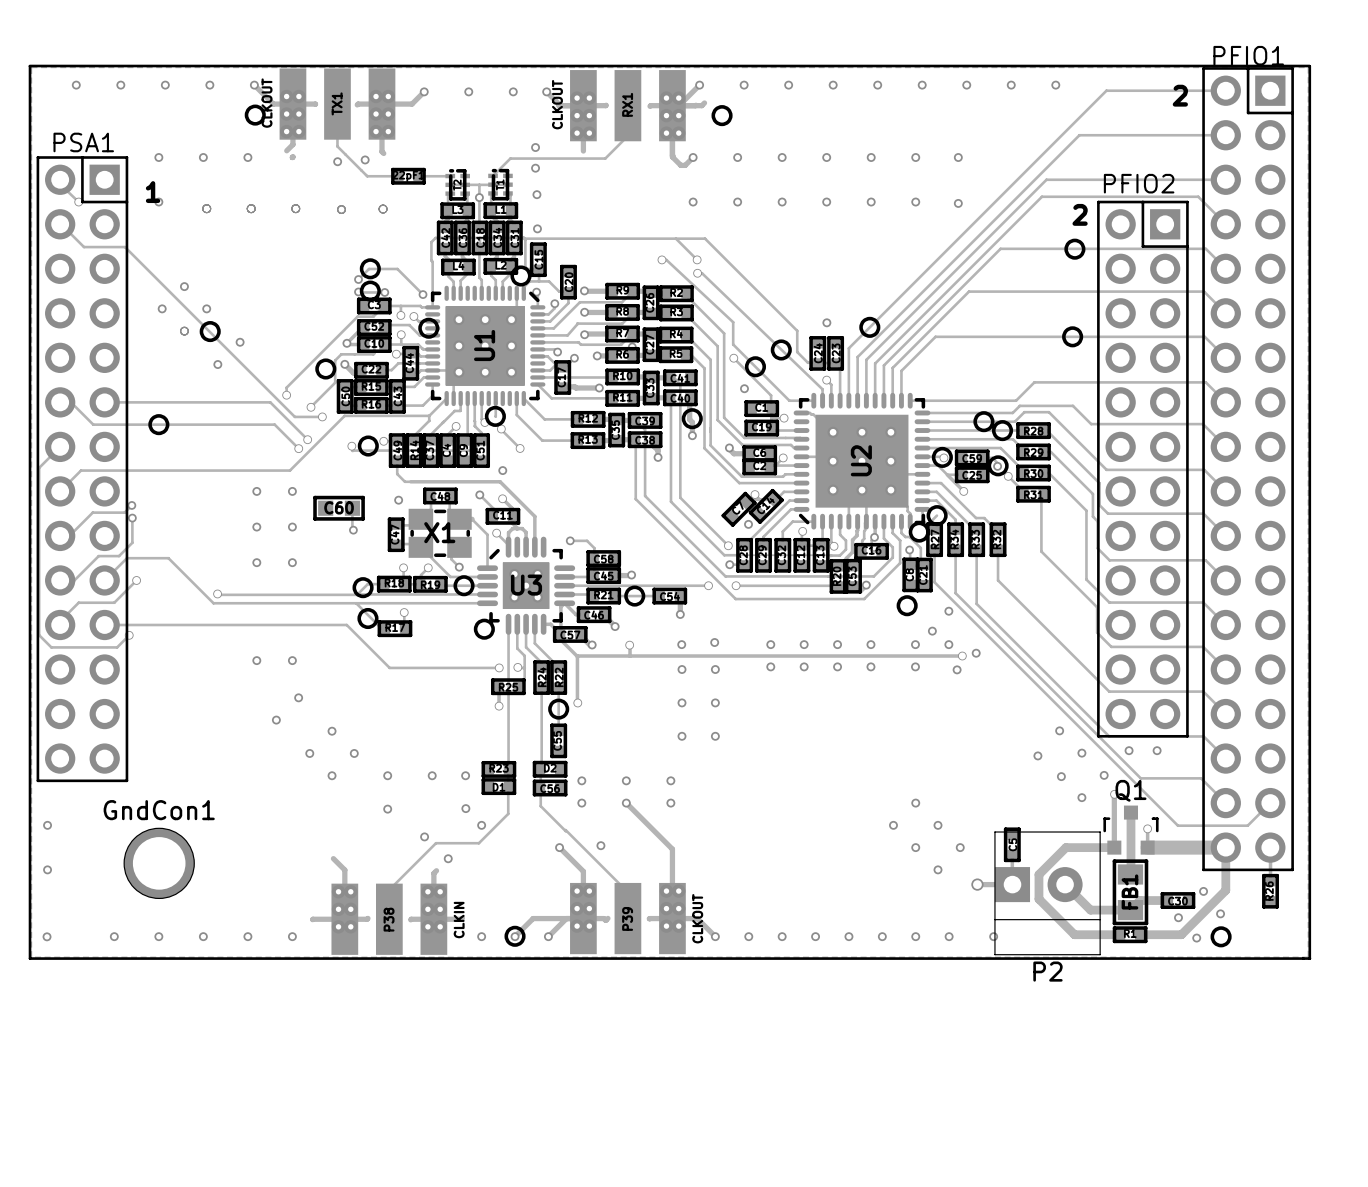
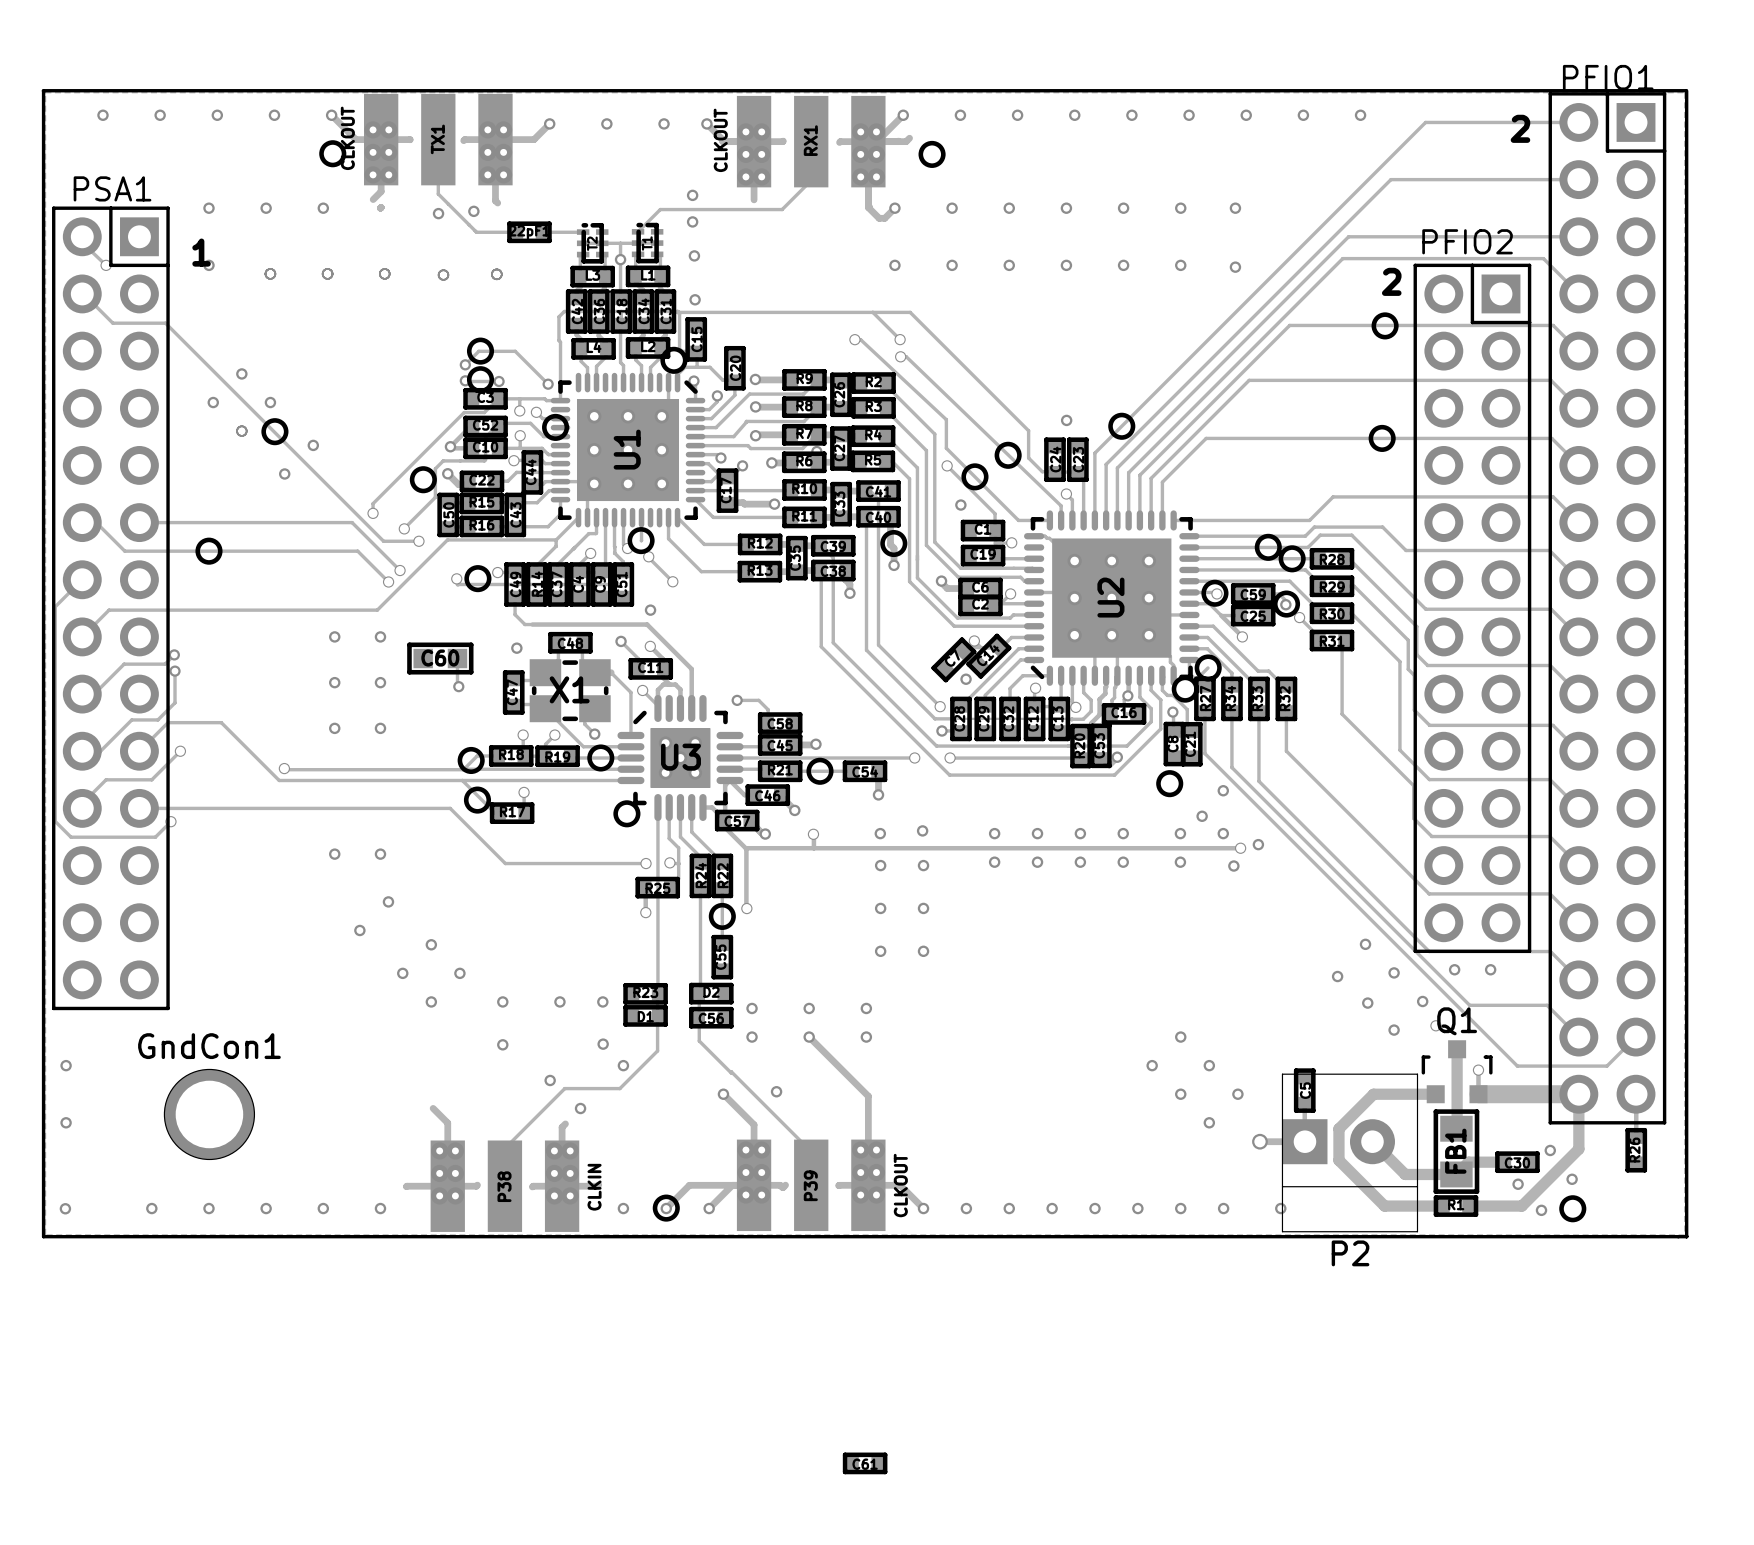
track: (1114, 794) (1114, 847) -> none
C61: none -> (865, 1463)

